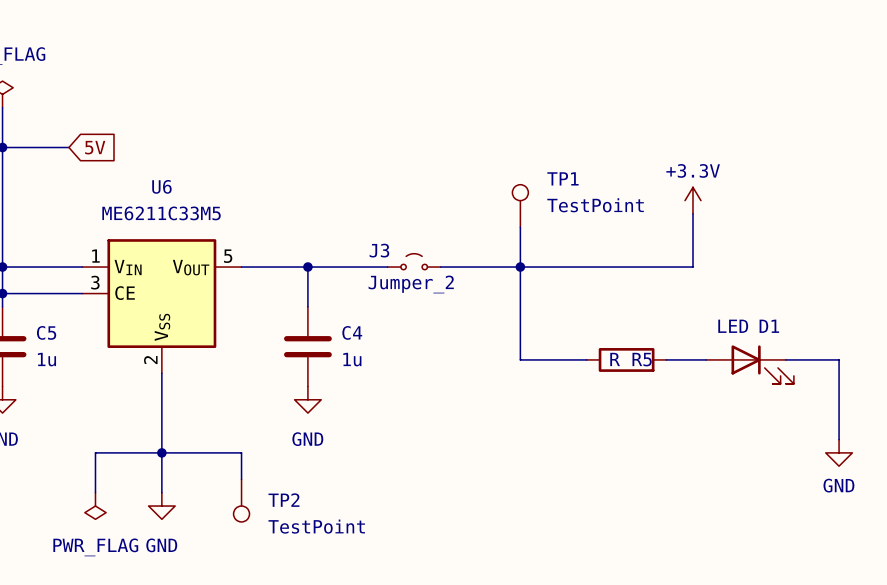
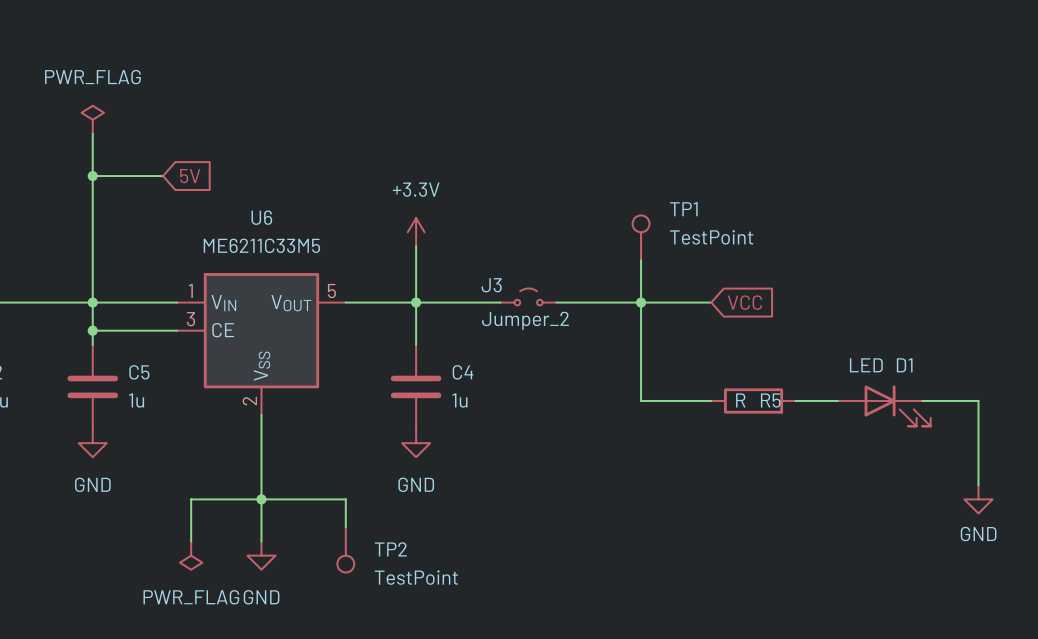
power symbol: none -> +3.3V (416, 232)
power symbol: +3.3V (692, 200) -> none
wire: none -> (416, 246) (416, 302)
wire: (692, 213) (692, 267) (586, 267) -> none
global label: none -> VCC (744, 302)

